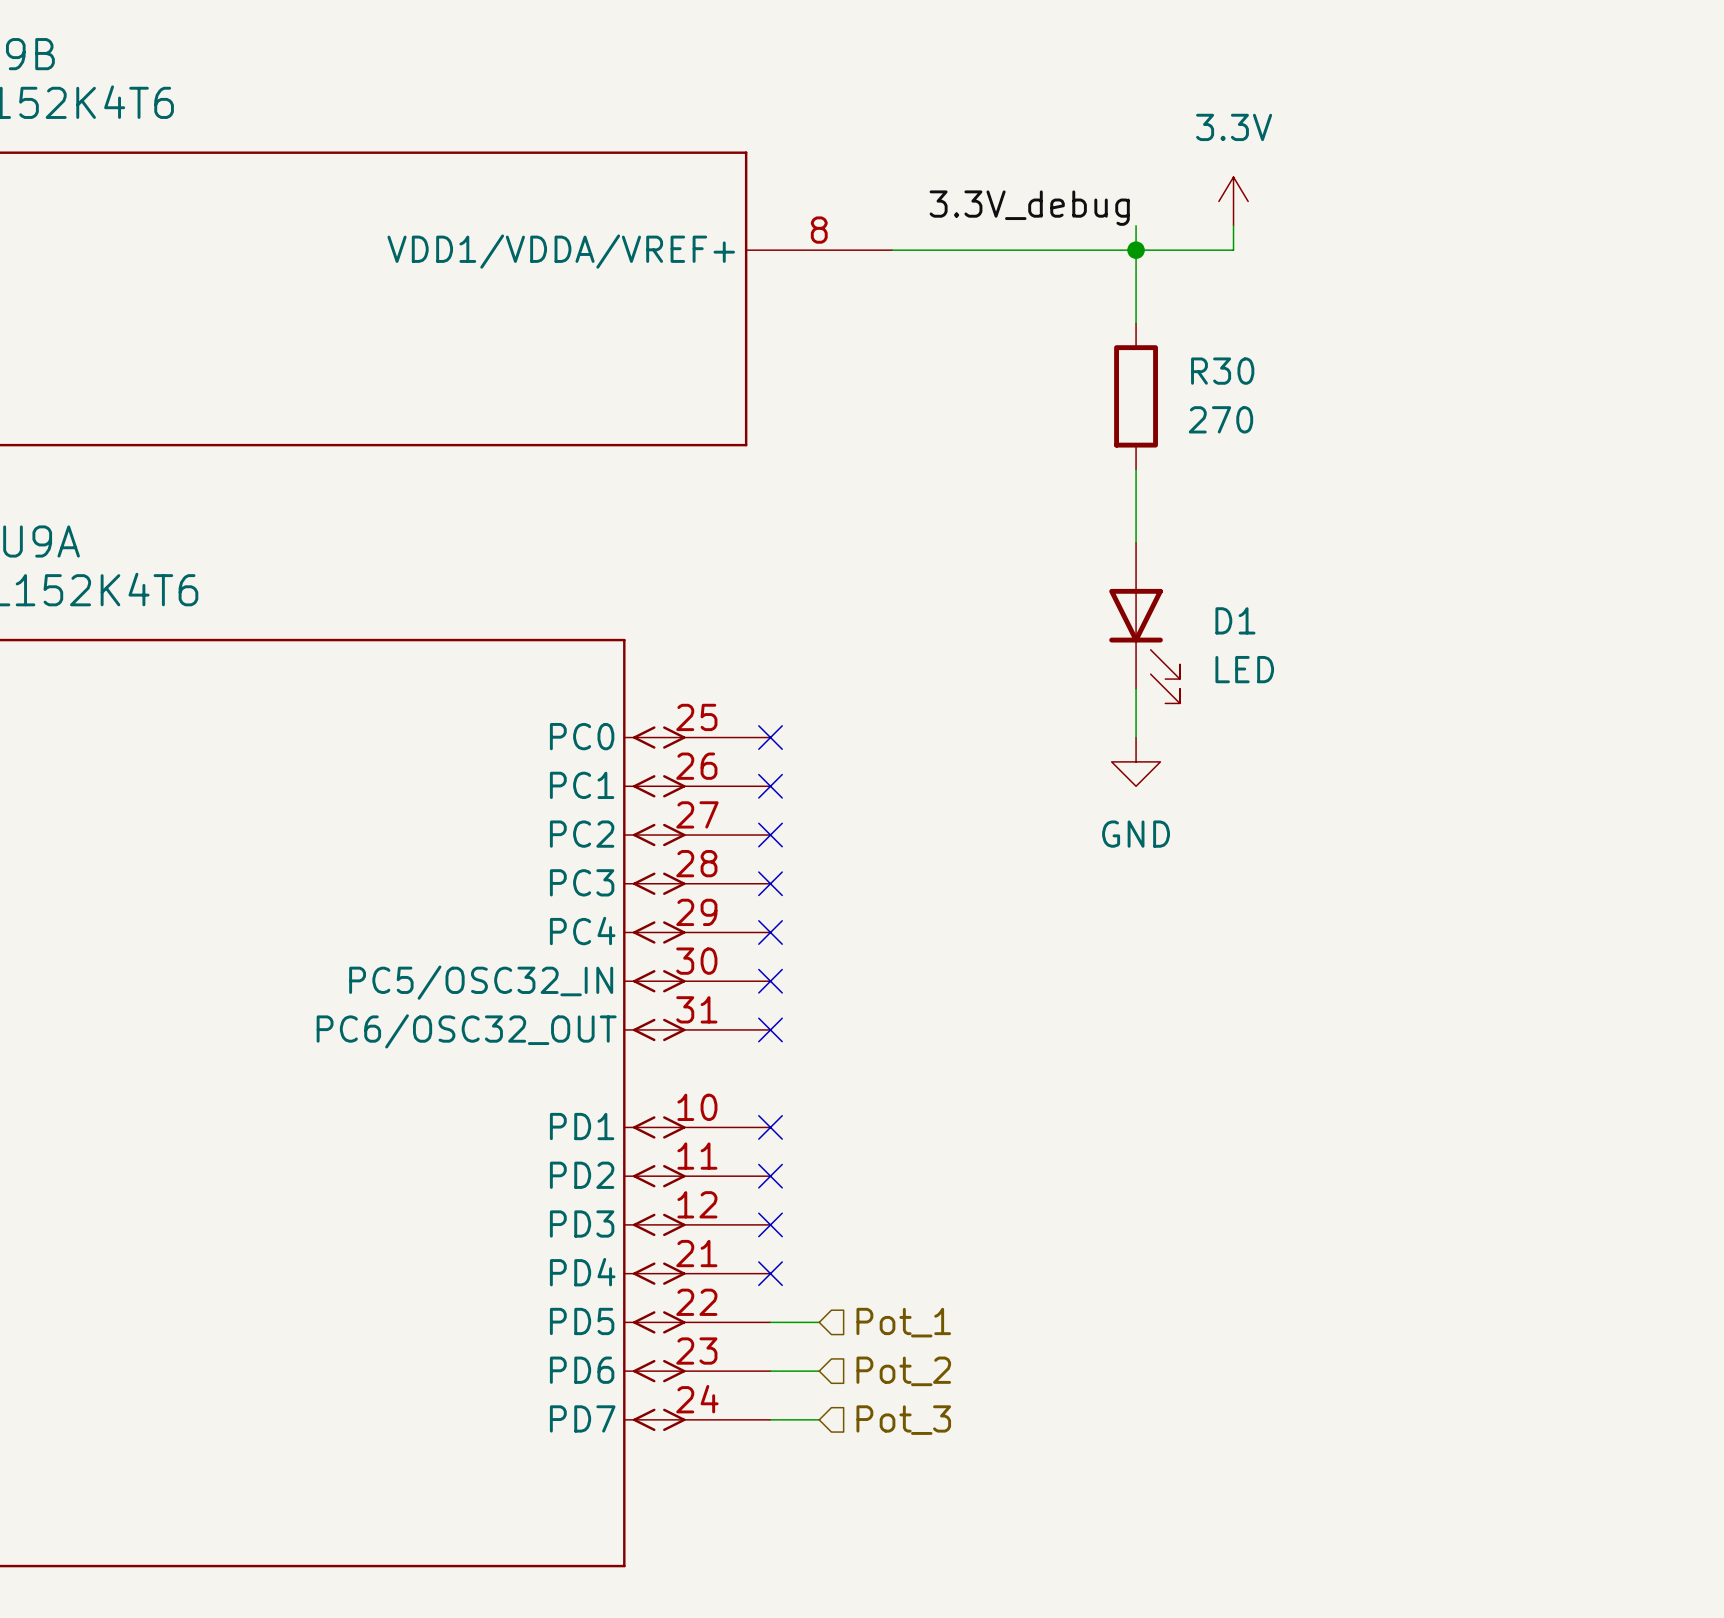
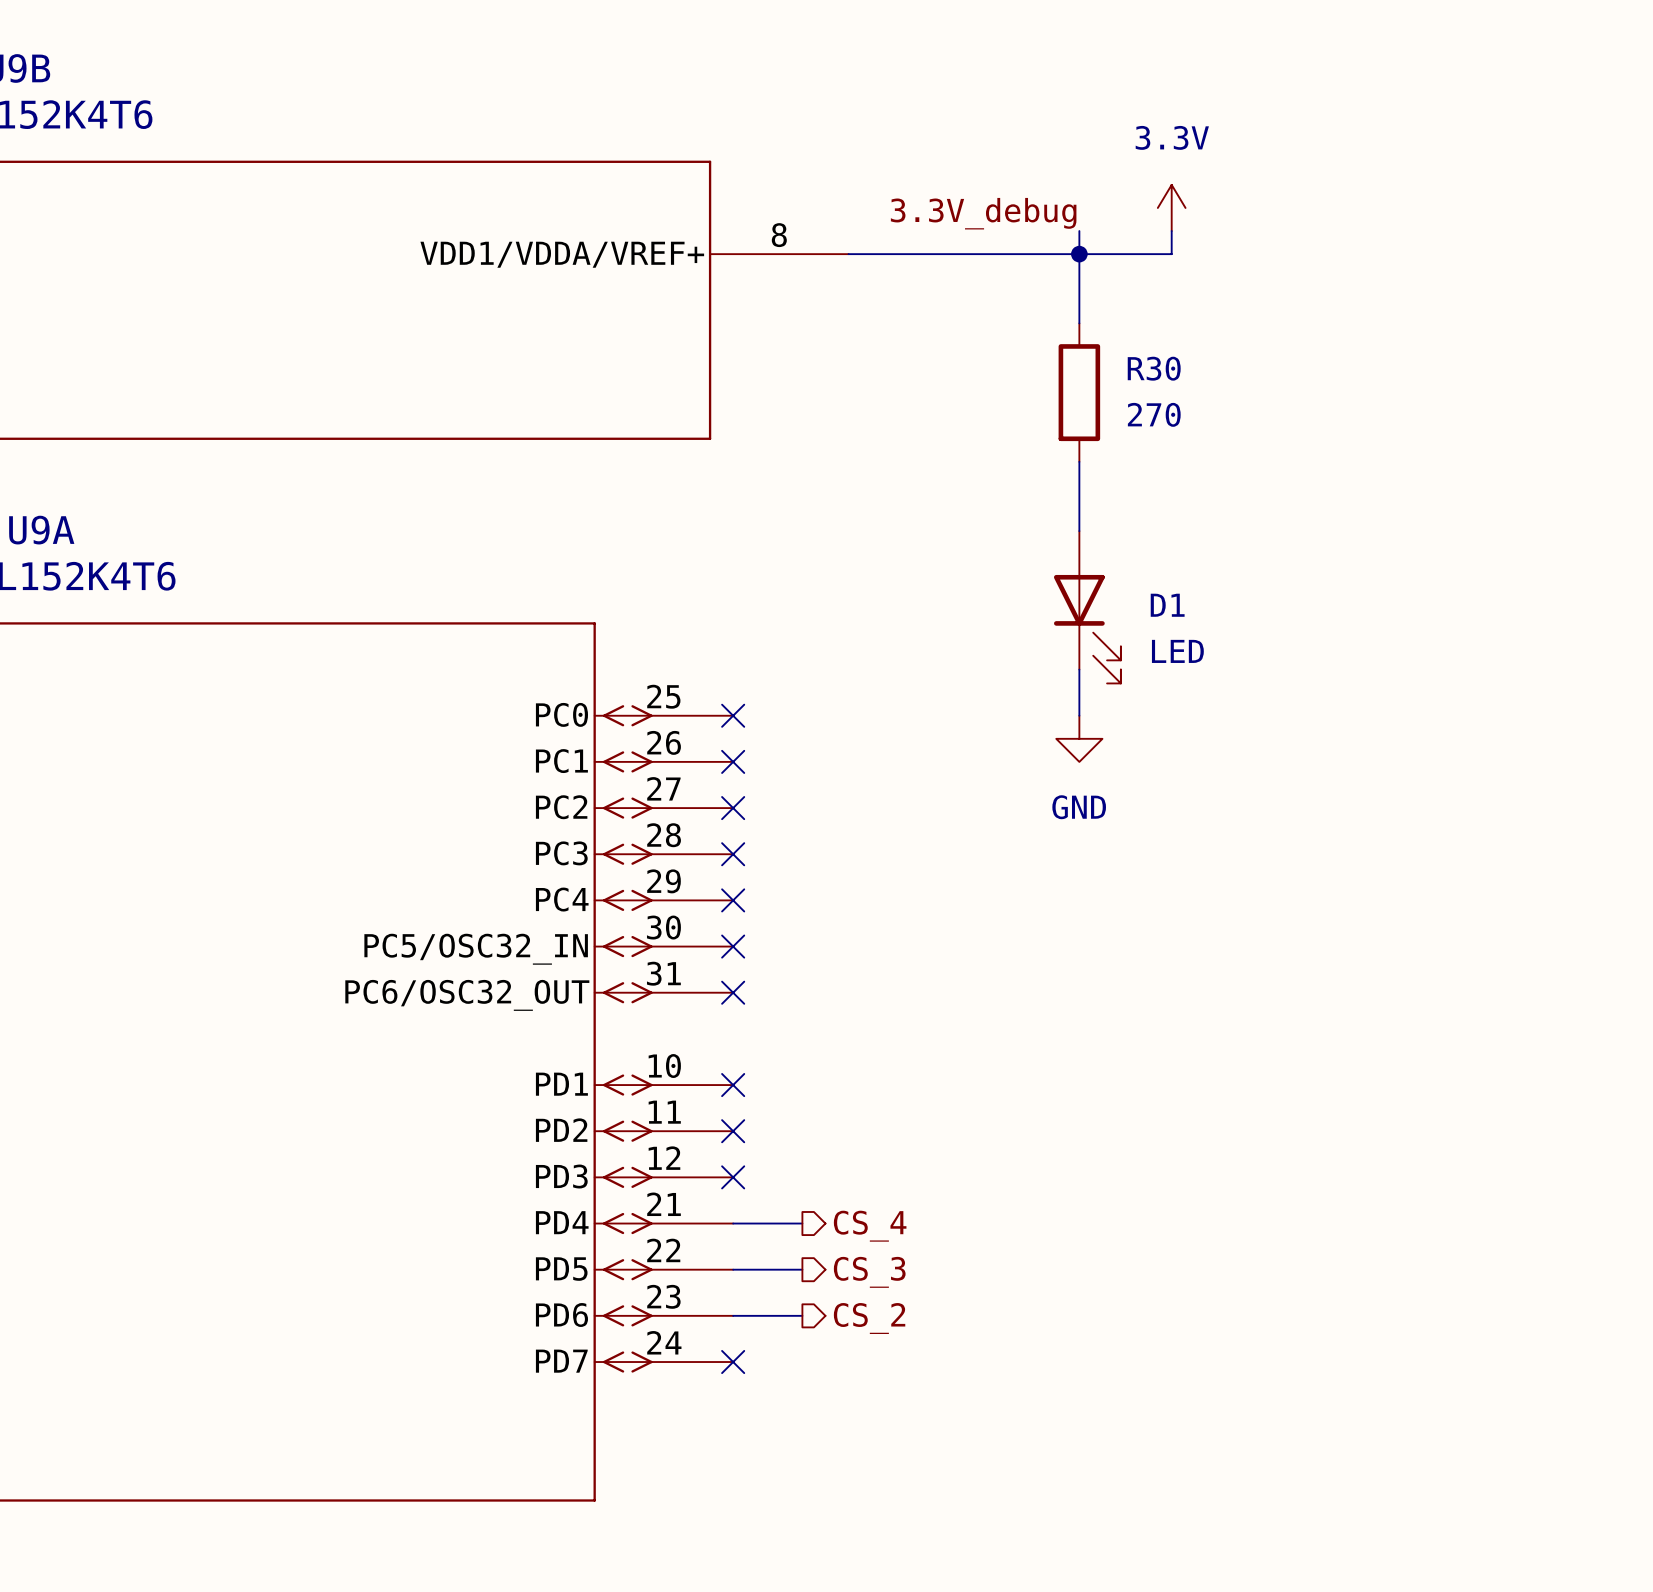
wire: none -> (733, 1223) (802, 1223)
no-connect mark: (770, 1273) -> none
hierarchical label: none -> CS_4 (870, 1226)
wire: none -> (779, 1269) (802, 1269)
hierarchical label: Pot_1 (903, 1322) -> none
hierarchical label: none -> CS_3 (869, 1272)
wire: none -> (779, 1315) (802, 1315)
hierarchical label: Pot_2 (903, 1371) -> none
hierarchical label: none -> CS_2 (869, 1318)
wire: (770, 1419) (819, 1419) -> none
no-connect mark: none -> (733, 1362)
hierarchical label: Pot_3 (903, 1420) -> none

